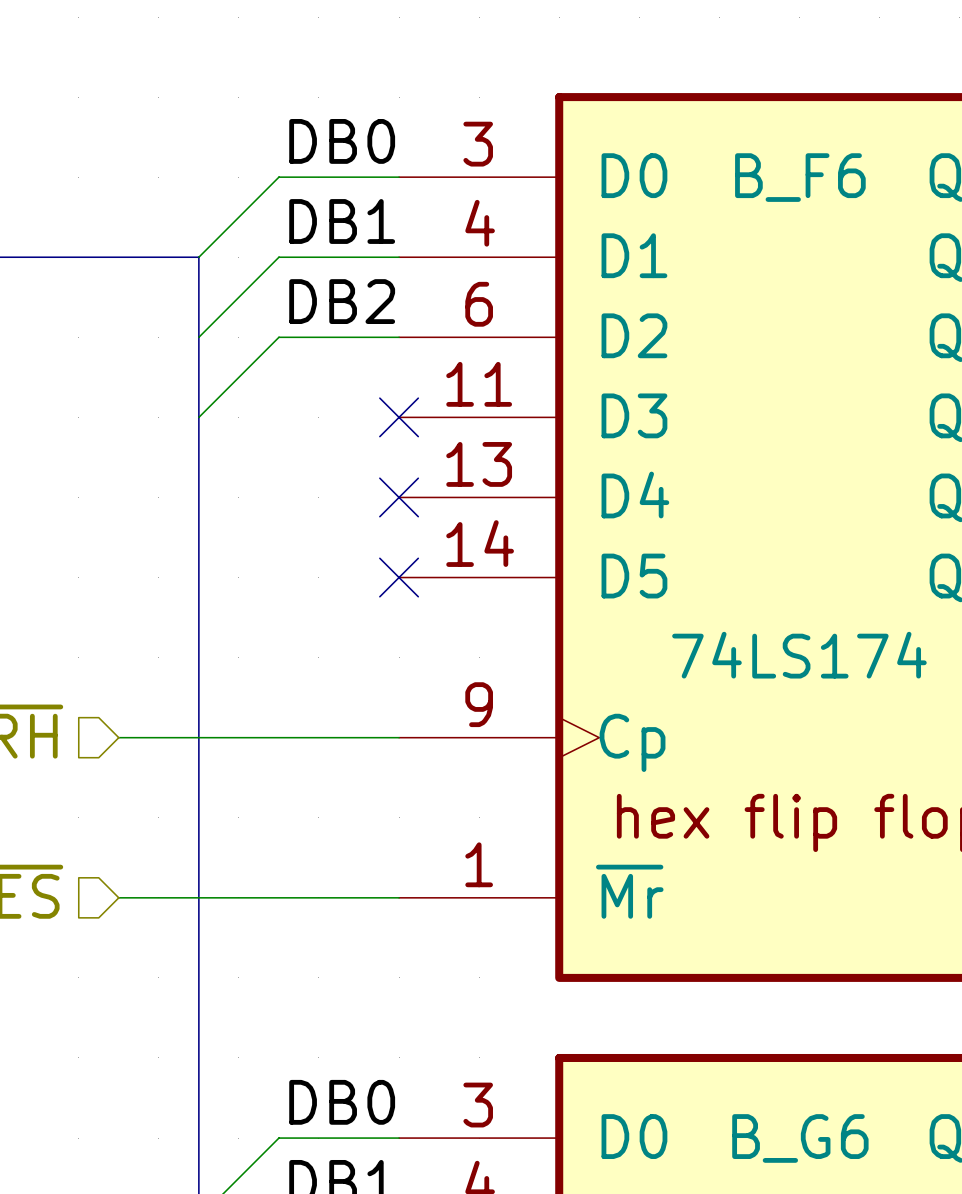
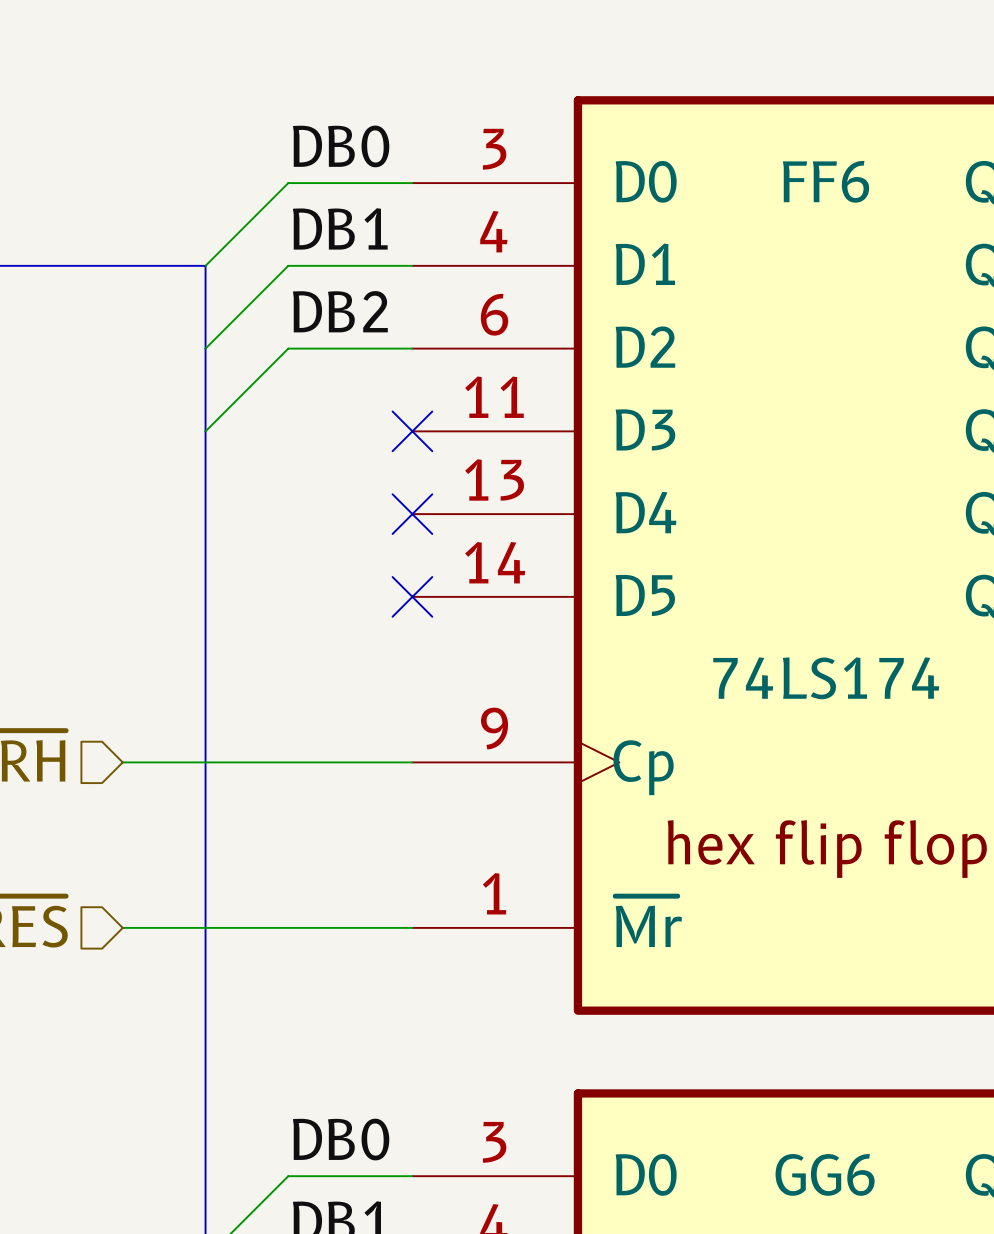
B_F6 name: B_F6 (800, 177) -> FF6 (826, 181)
B_G6 name: B_G6 (800, 1138) -> GG6 (825, 1174)

